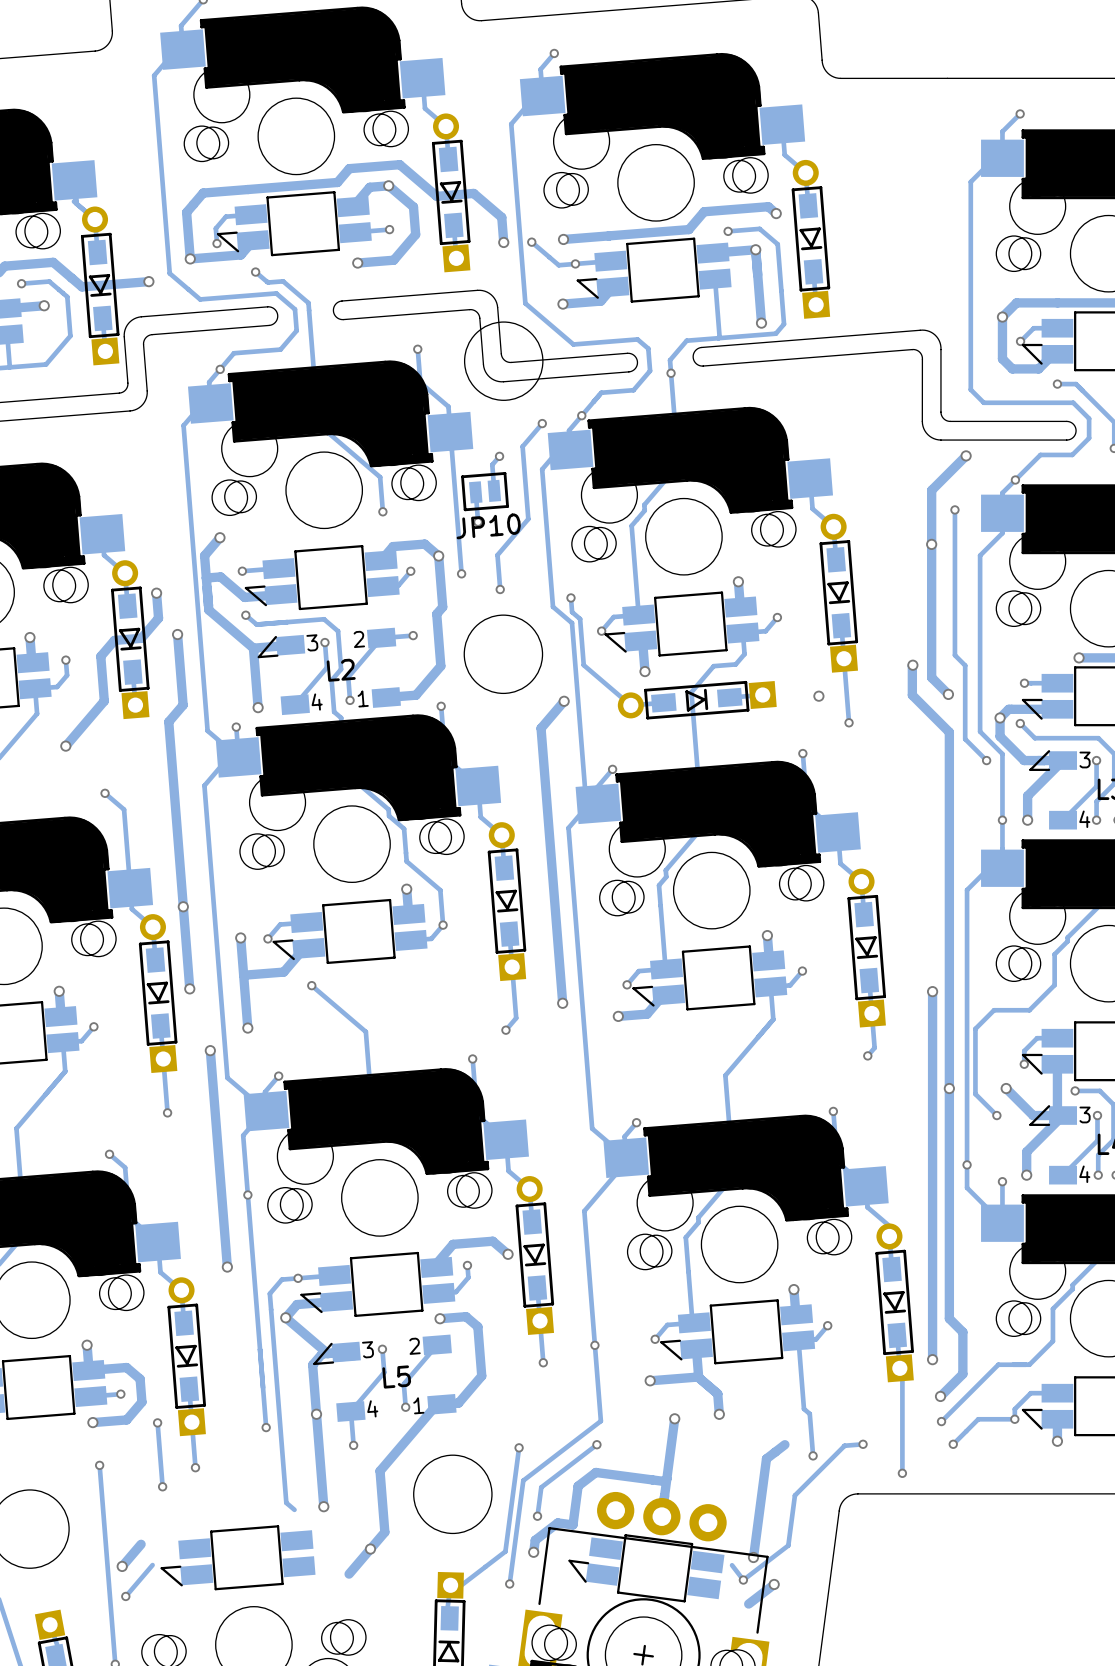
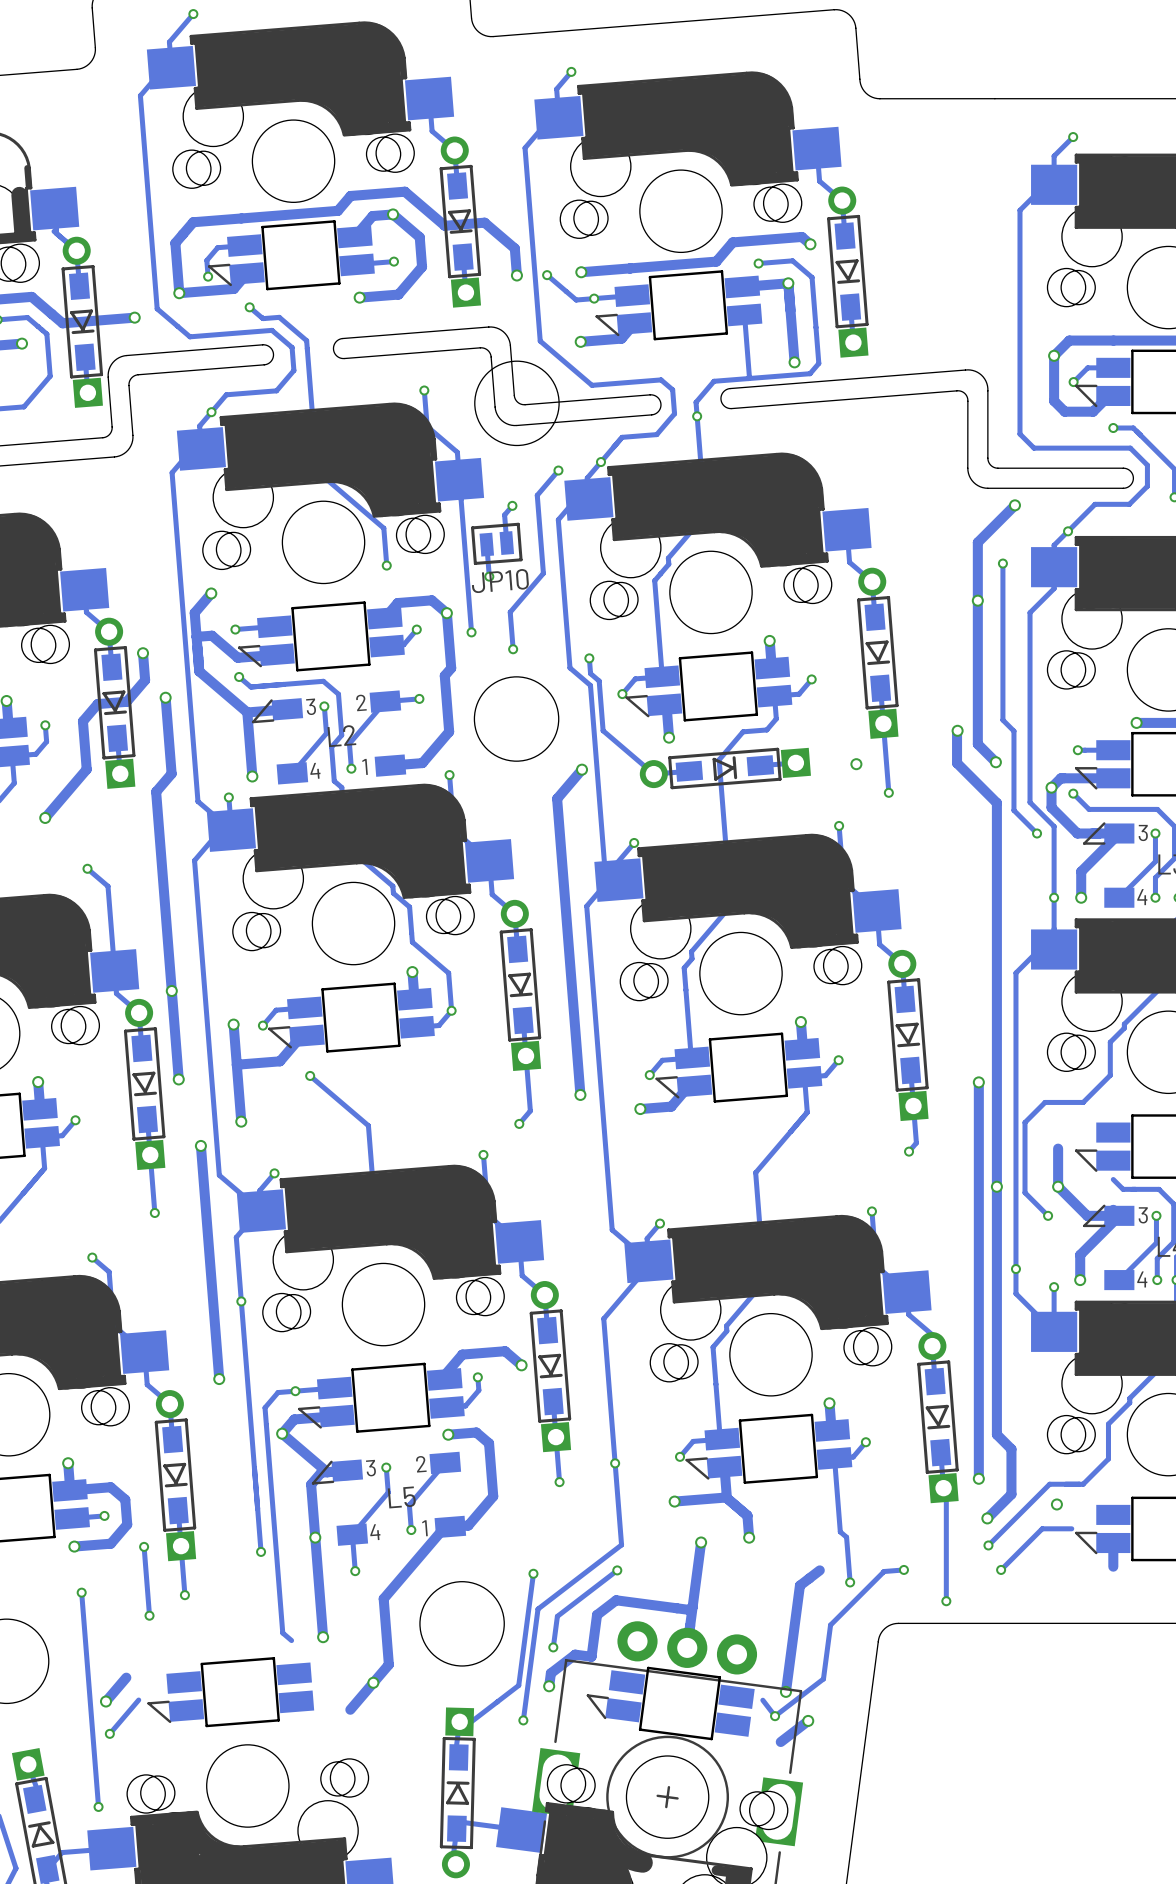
track: (1057, 1038) (1037, 1038) (1024, 1051) (1024, 1064) -> none
track: none -> (1058, 1148) (1058, 1186)
via: (1024, 1064) -> none
track: (1057, 1064) (1057, 1109) -> none
track: none -> (1113, 1179) (1123, 1189) (1132, 1189)
via: (1075, 1090) -> none
track: (1057, 1393) (1030, 1393) (1014, 1409) (1014, 1419) (978, 1419) -> (1071, 1528) (1042, 1528) (1028, 1543)
via: (1014, 1419) -> none
via position: (1057, 1441) -> (1056, 1504)

